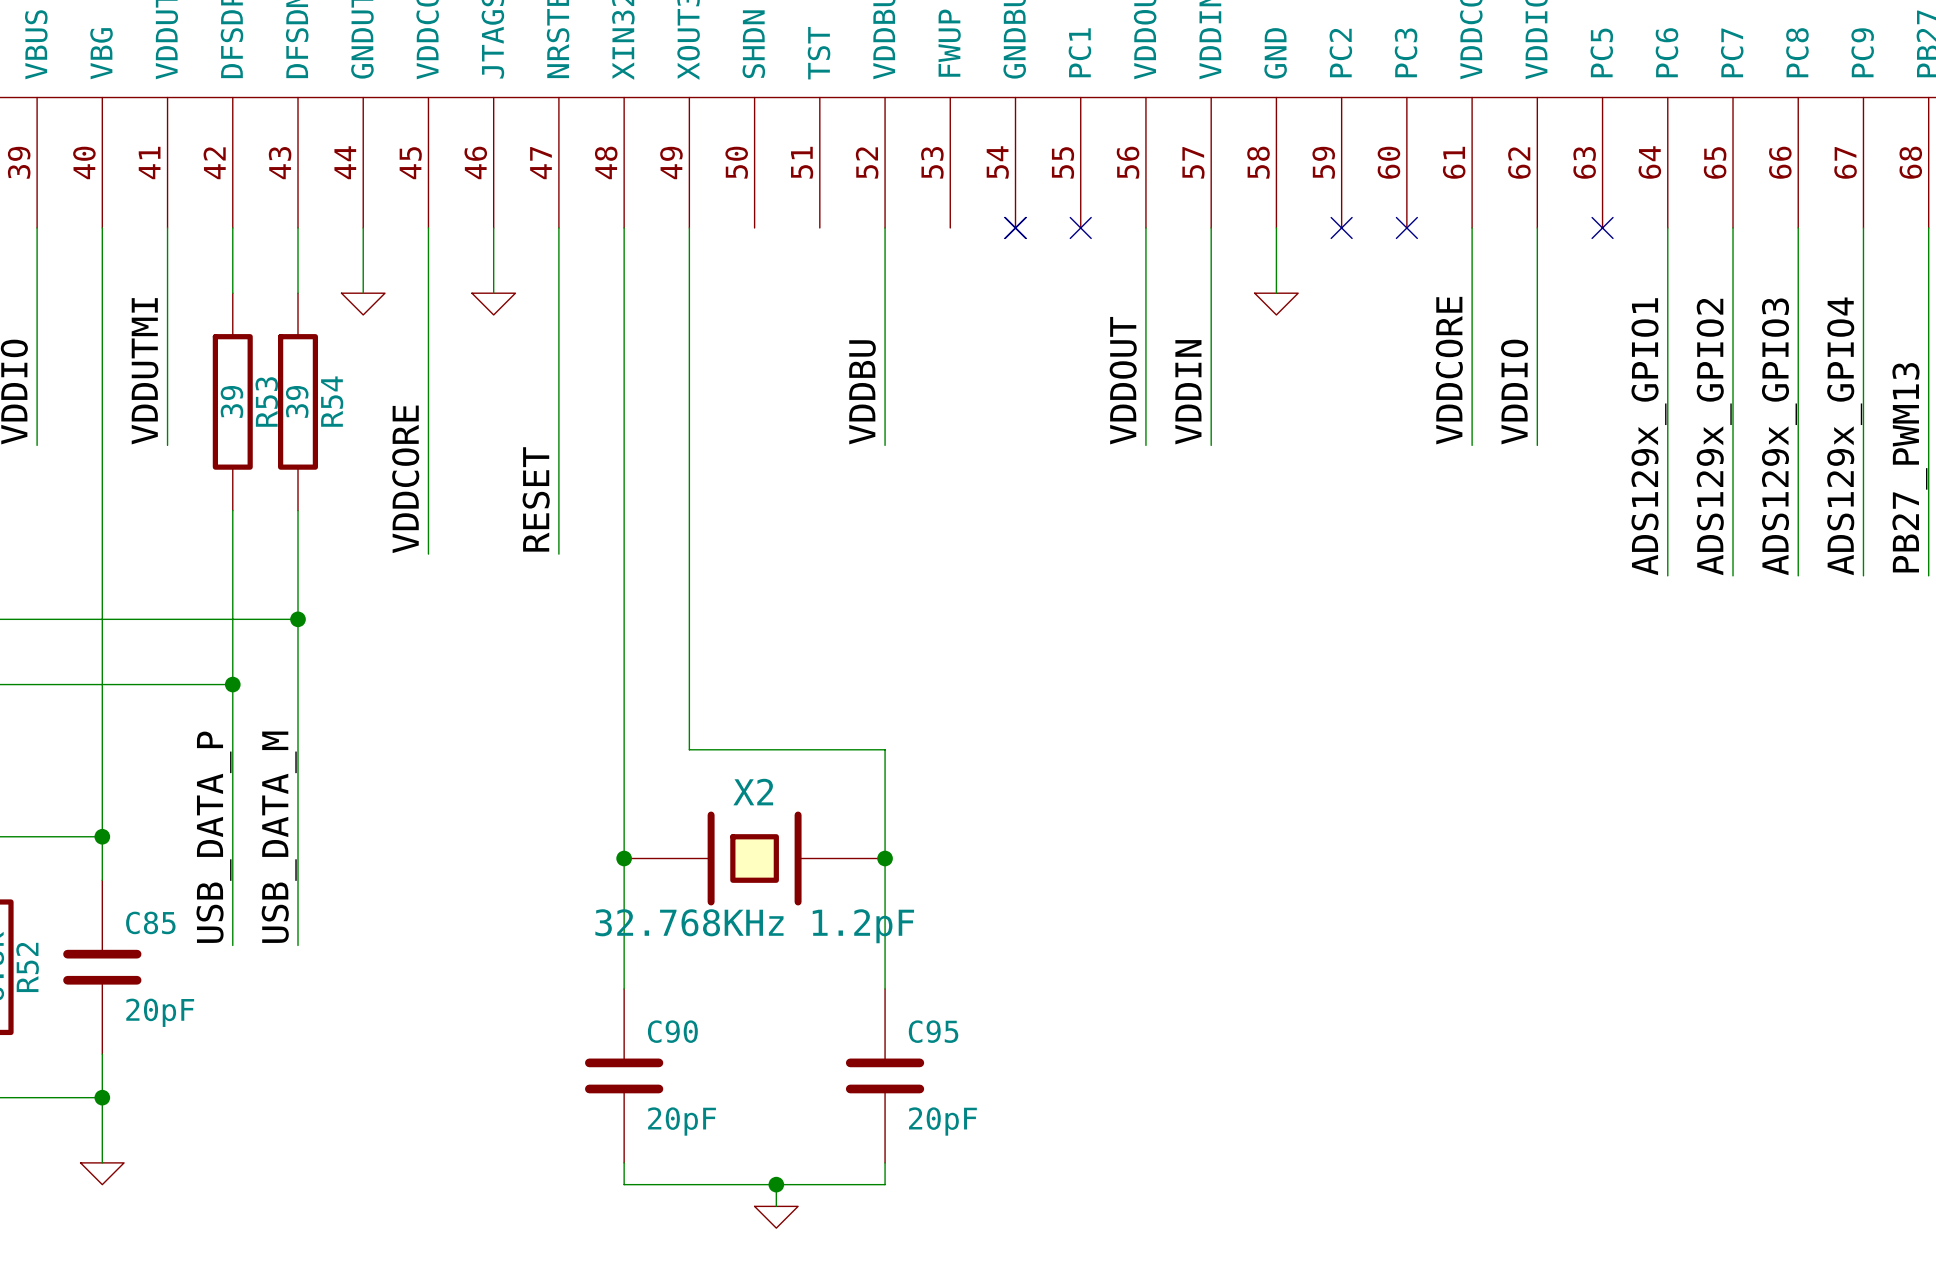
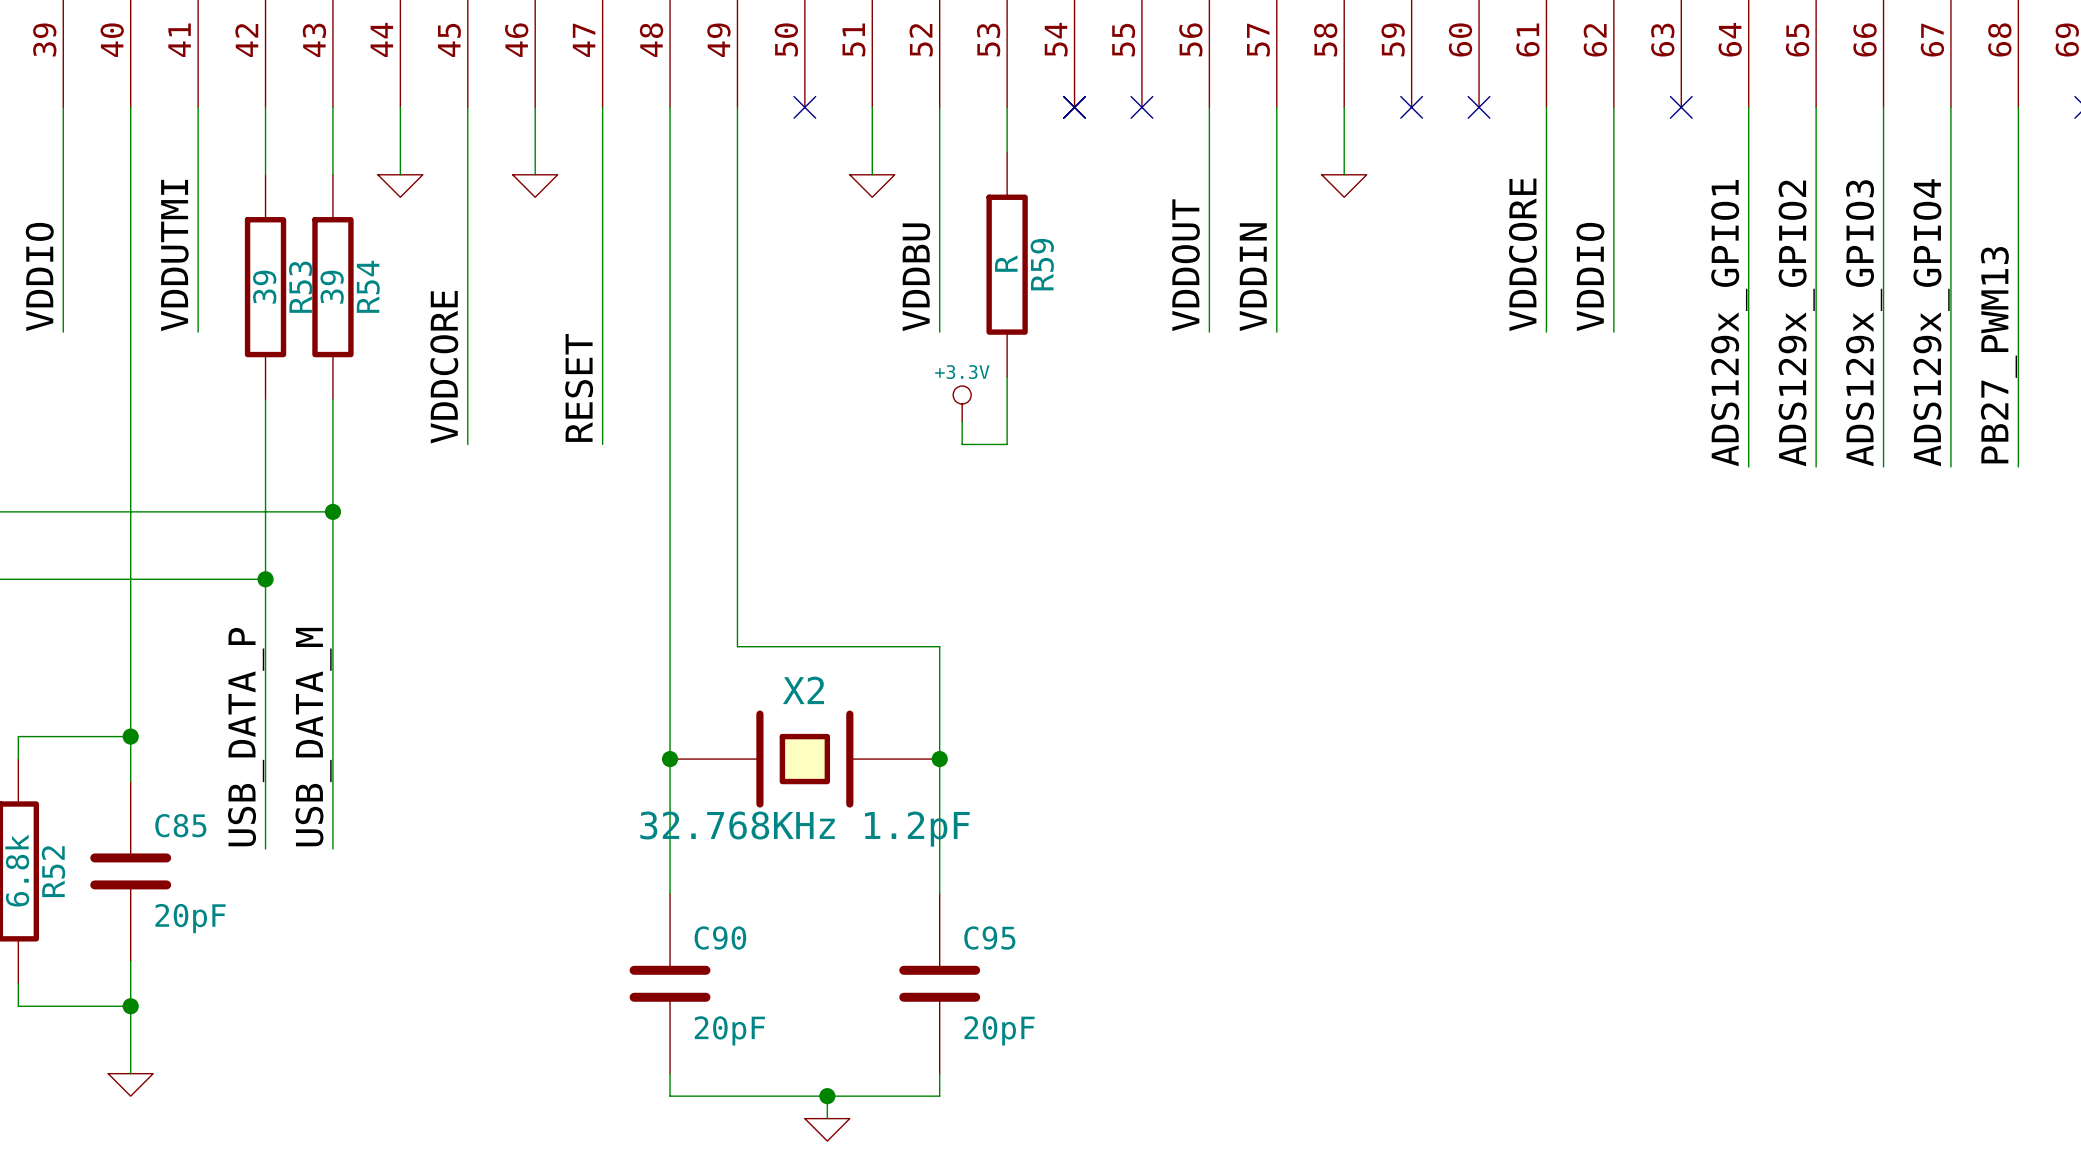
no-connect mark: none -> (804, 107)
wire: none -> (872, 107) (872, 174)
wire: none -> (1007, 107) (1007, 152)
power symbol: none -> (872, 186)
R59: none -> R (1007, 264)
wire: none -> (1007, 377) (1007, 444) (962, 444) (962, 421)
power symbol: none -> +3.3V (962, 404)

